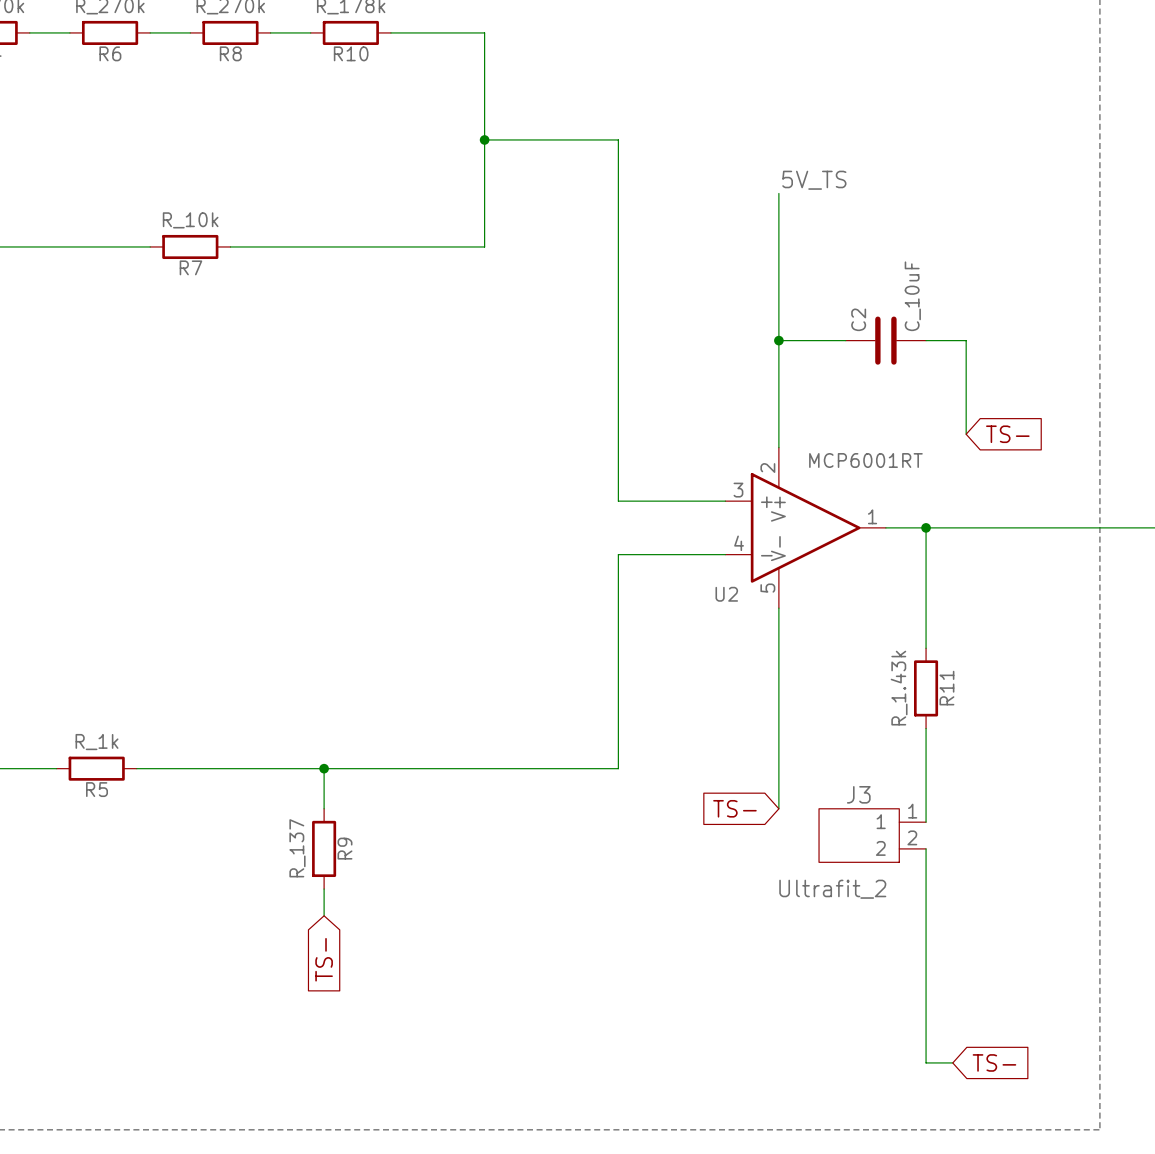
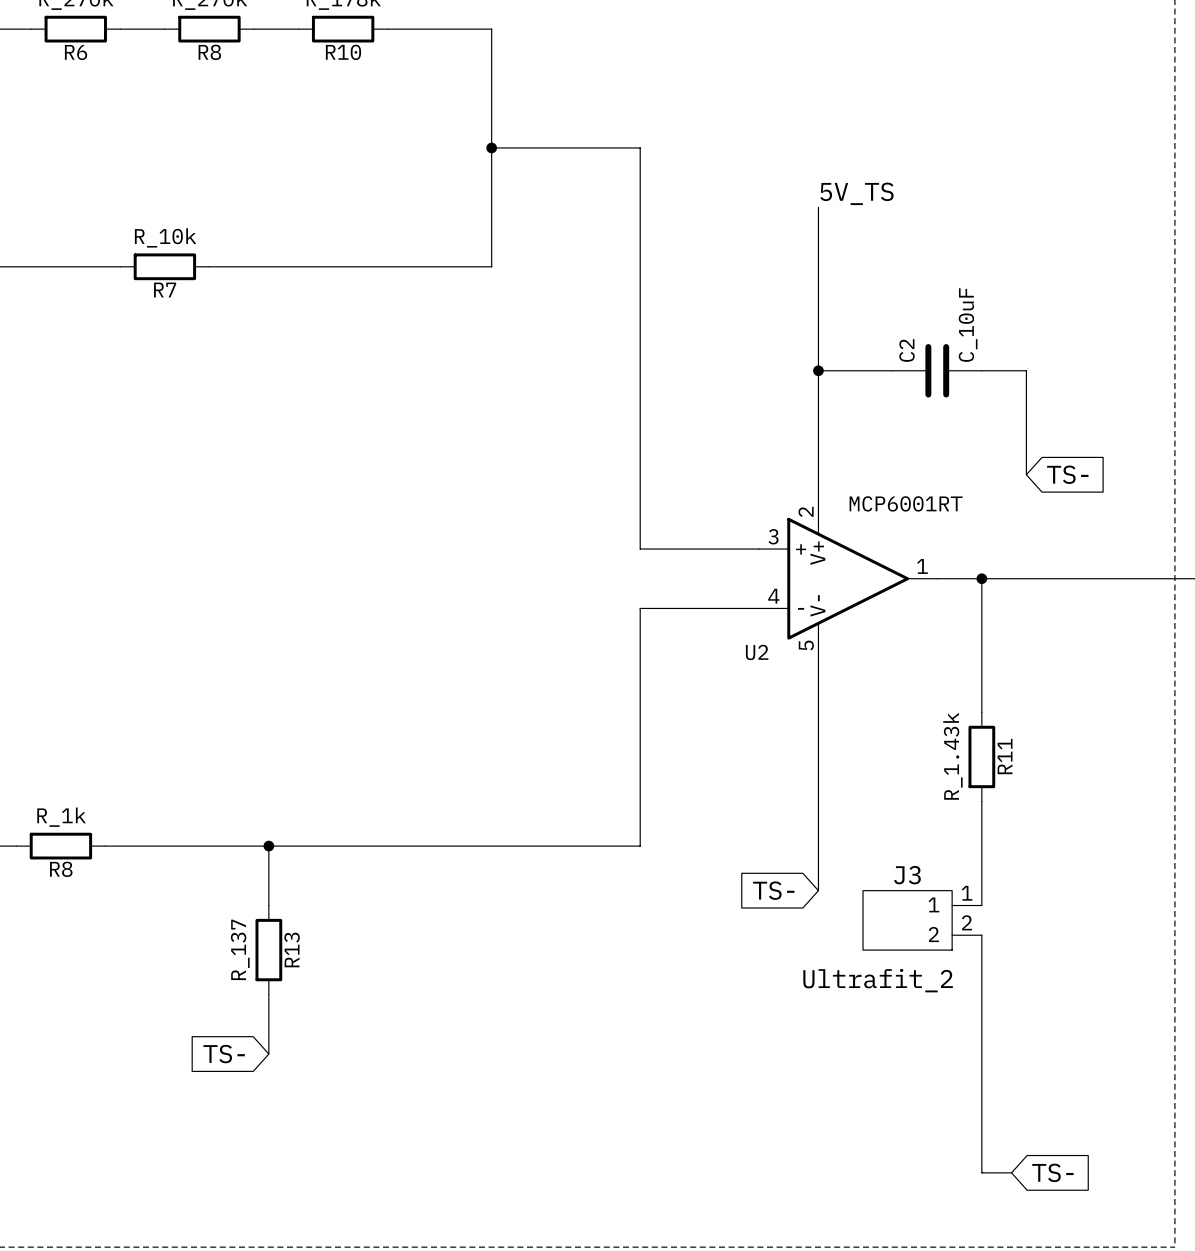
wire: none -> (268, 846) (268, 905)
wire: (324, 768) (324, 808) -> none
junction position: (324, 768) -> (268, 846)
R5 name: R5 (97, 789) -> R8 (61, 869)
R9: R_137 (324, 848) -> none
R13: none -> R_137 (268, 950)
wire: (324, 889) (324, 915) -> none
wire: none -> (268, 994) (268, 1054)
global label rotation: 0° (324, 959) -> 90° clockwise (224, 1054)

